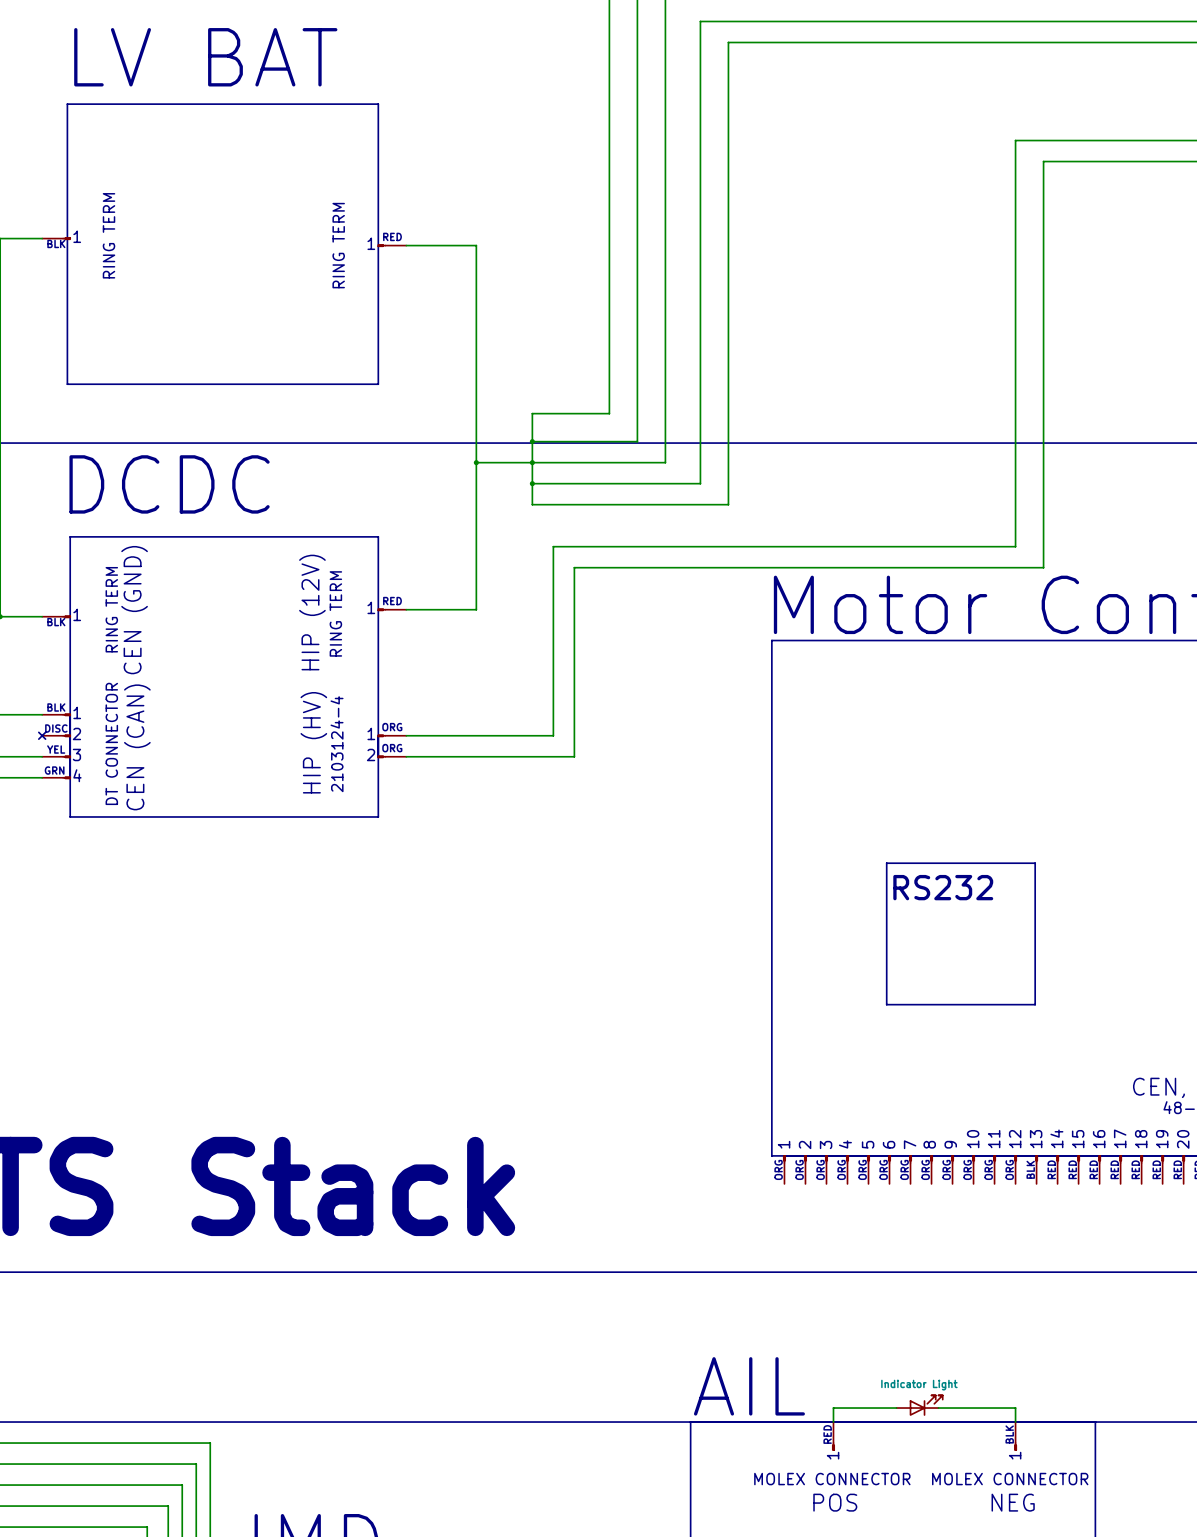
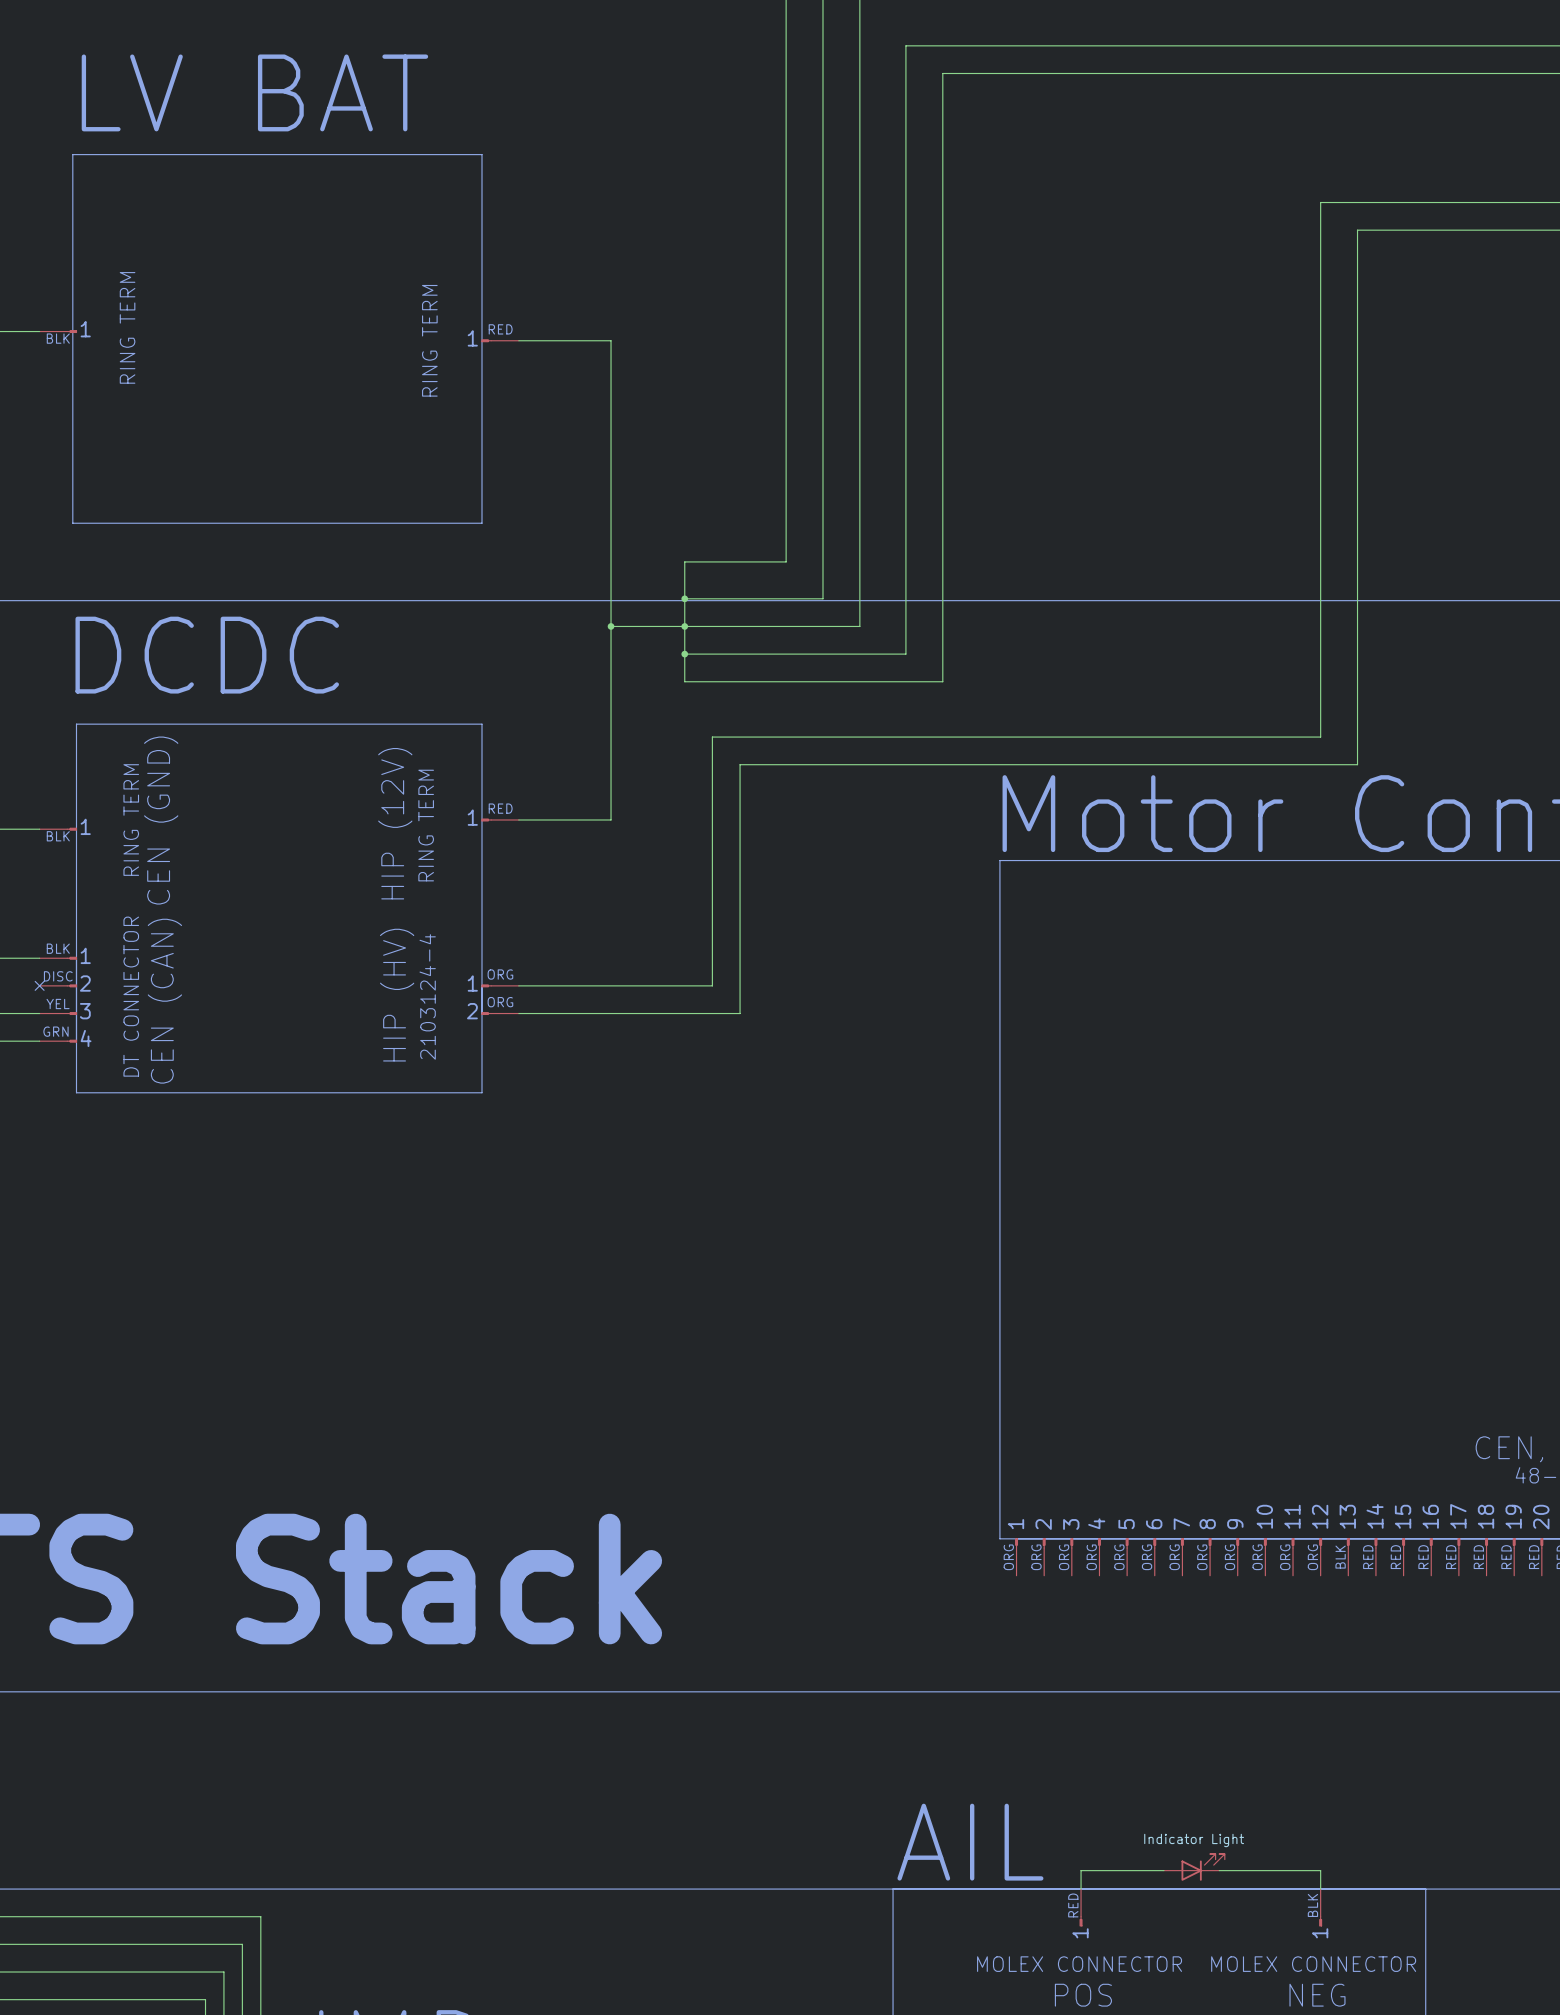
line: (886, 863) (1035, 863) (1035, 1004) (886, 1004) (886, 863) -> none
text: RS232 (943, 887) -> none

